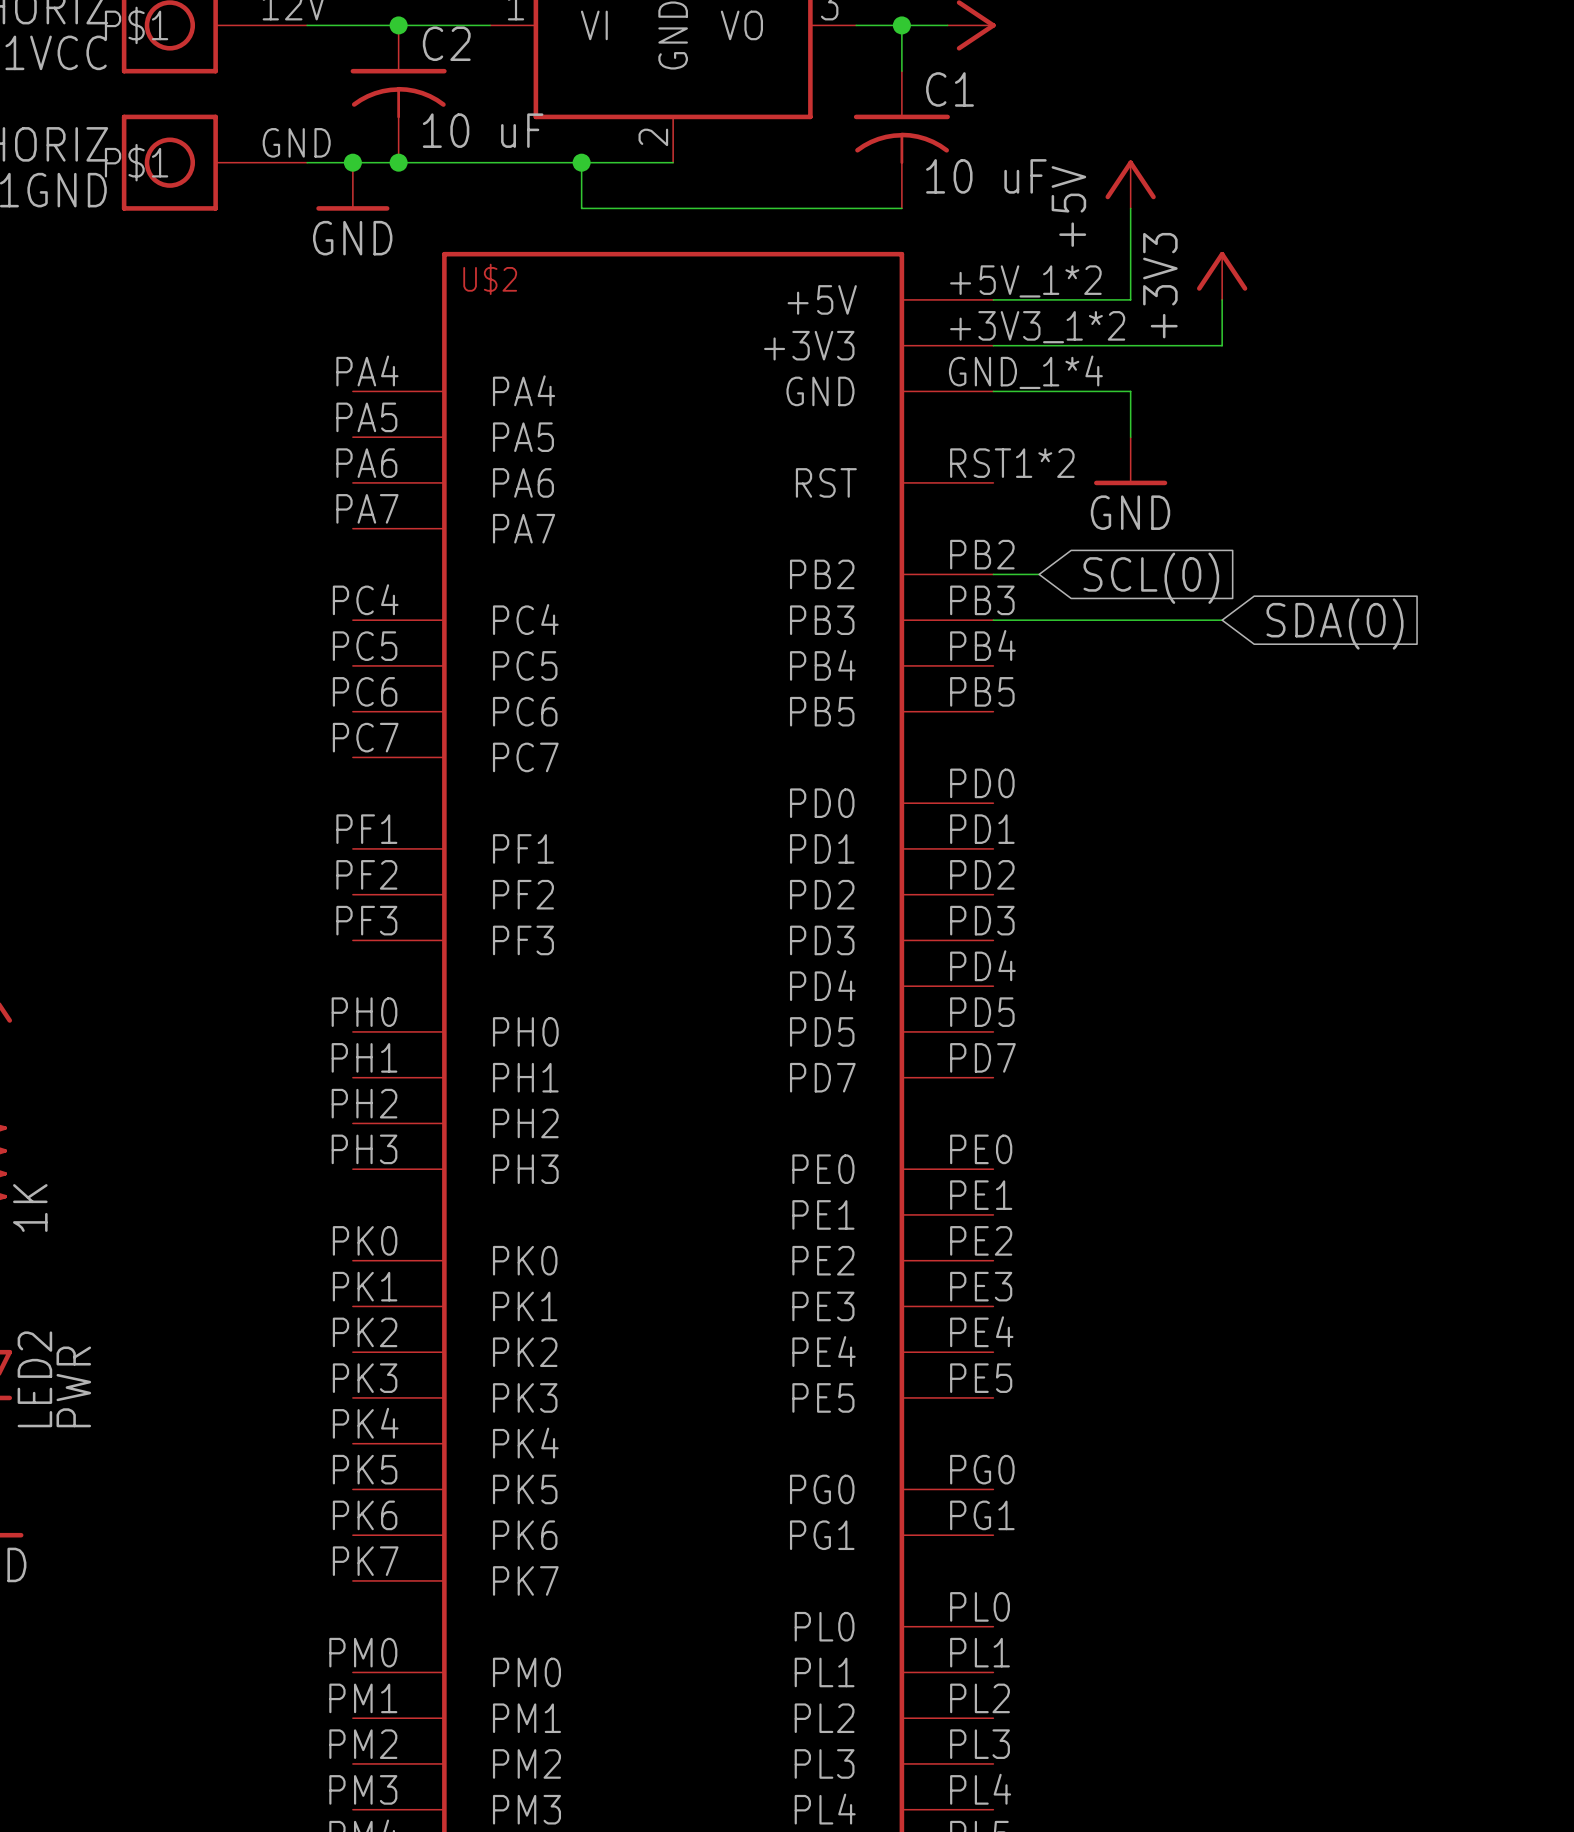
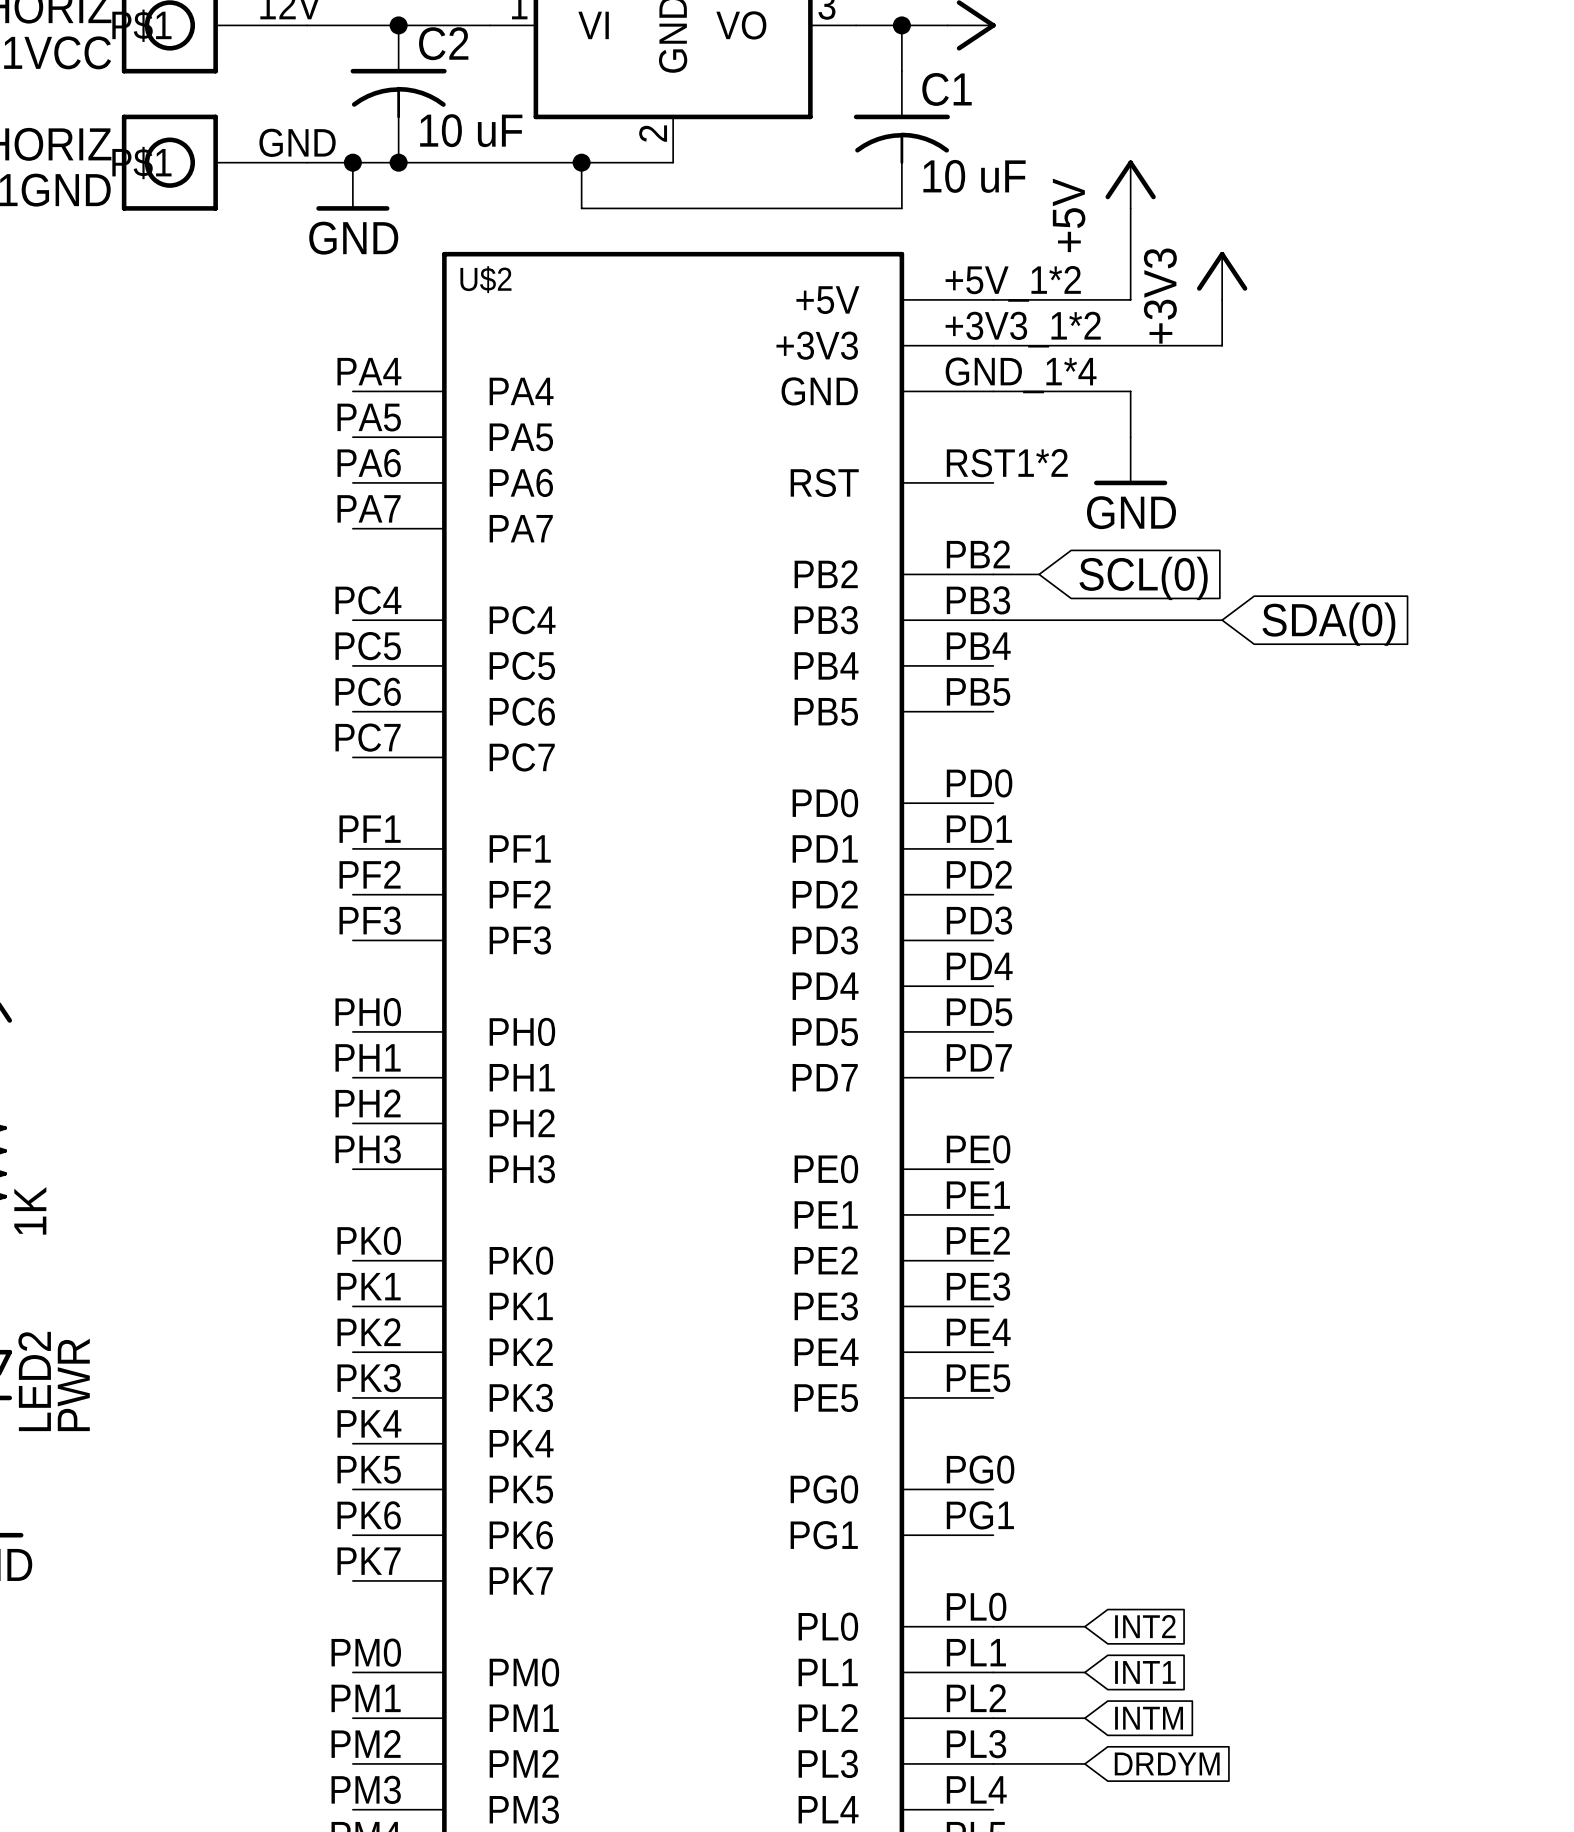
wire: none -> (993, 1626) (1084, 1626)
global label: none -> INT2 (1145, 1626)
wire: none -> (993, 1672) (1084, 1672)
global label: none -> INT1 (1145, 1672)
wire: none -> (993, 1718) (1084, 1718)
global label: none -> INTM (1149, 1718)
wire: none -> (993, 1763) (1084, 1763)
global label: none -> DRDYM (1167, 1763)

